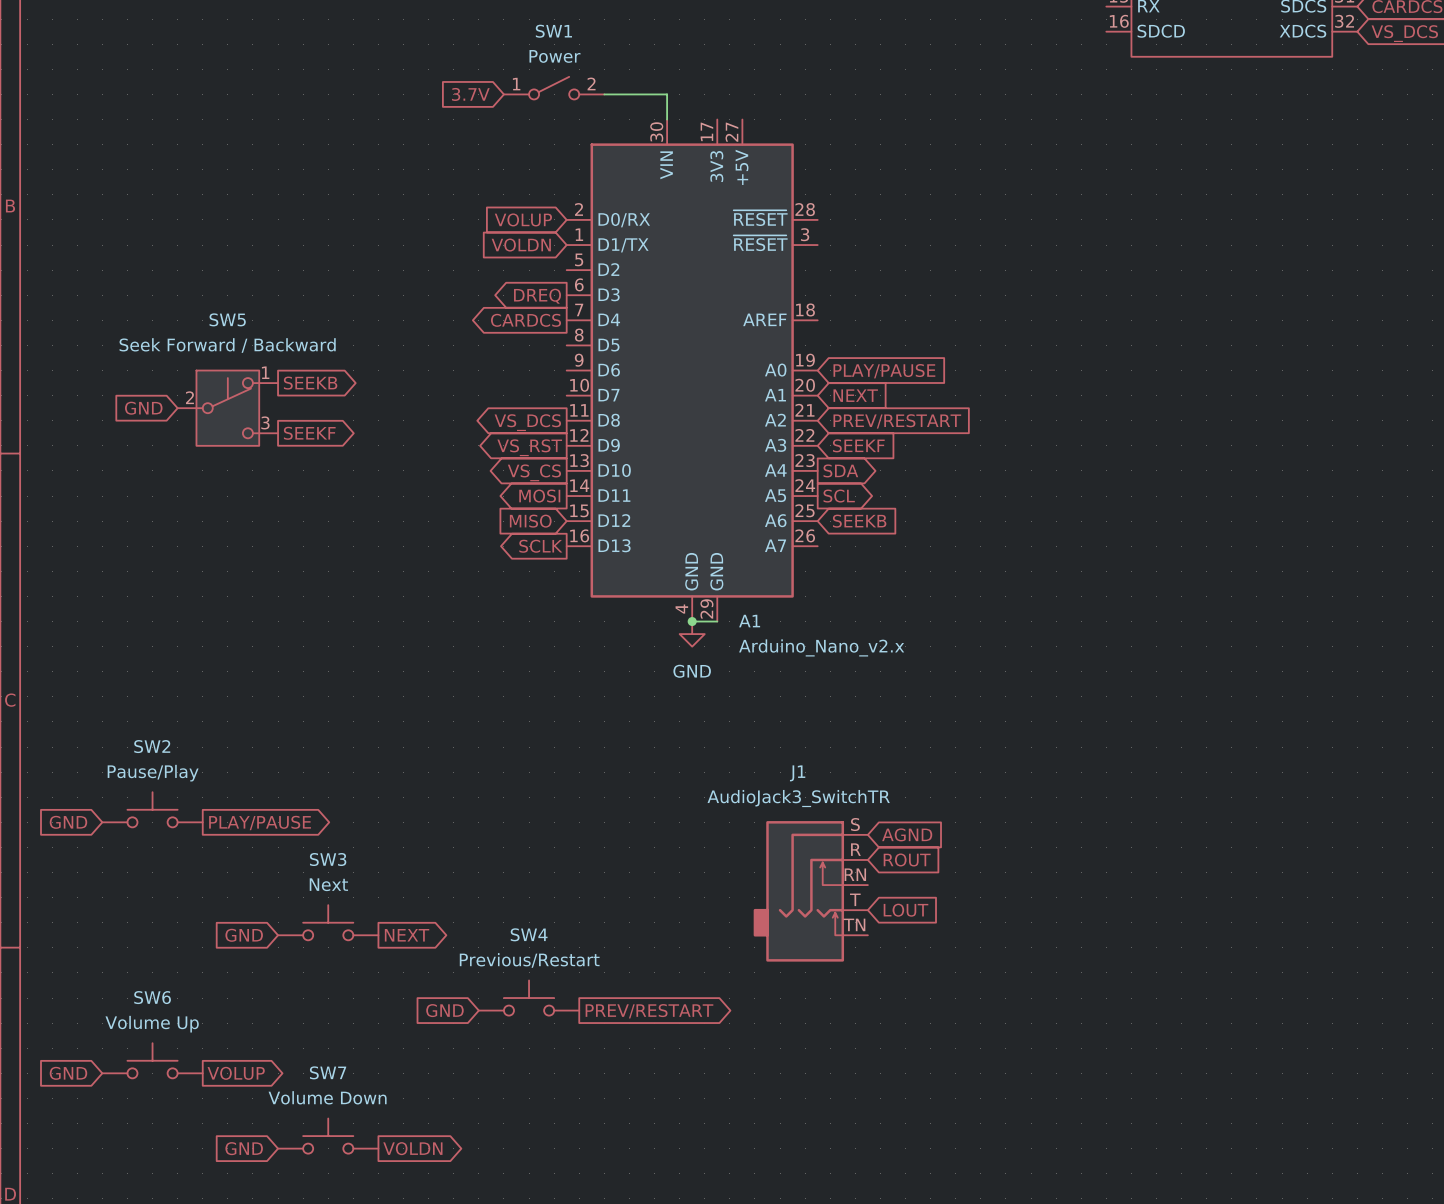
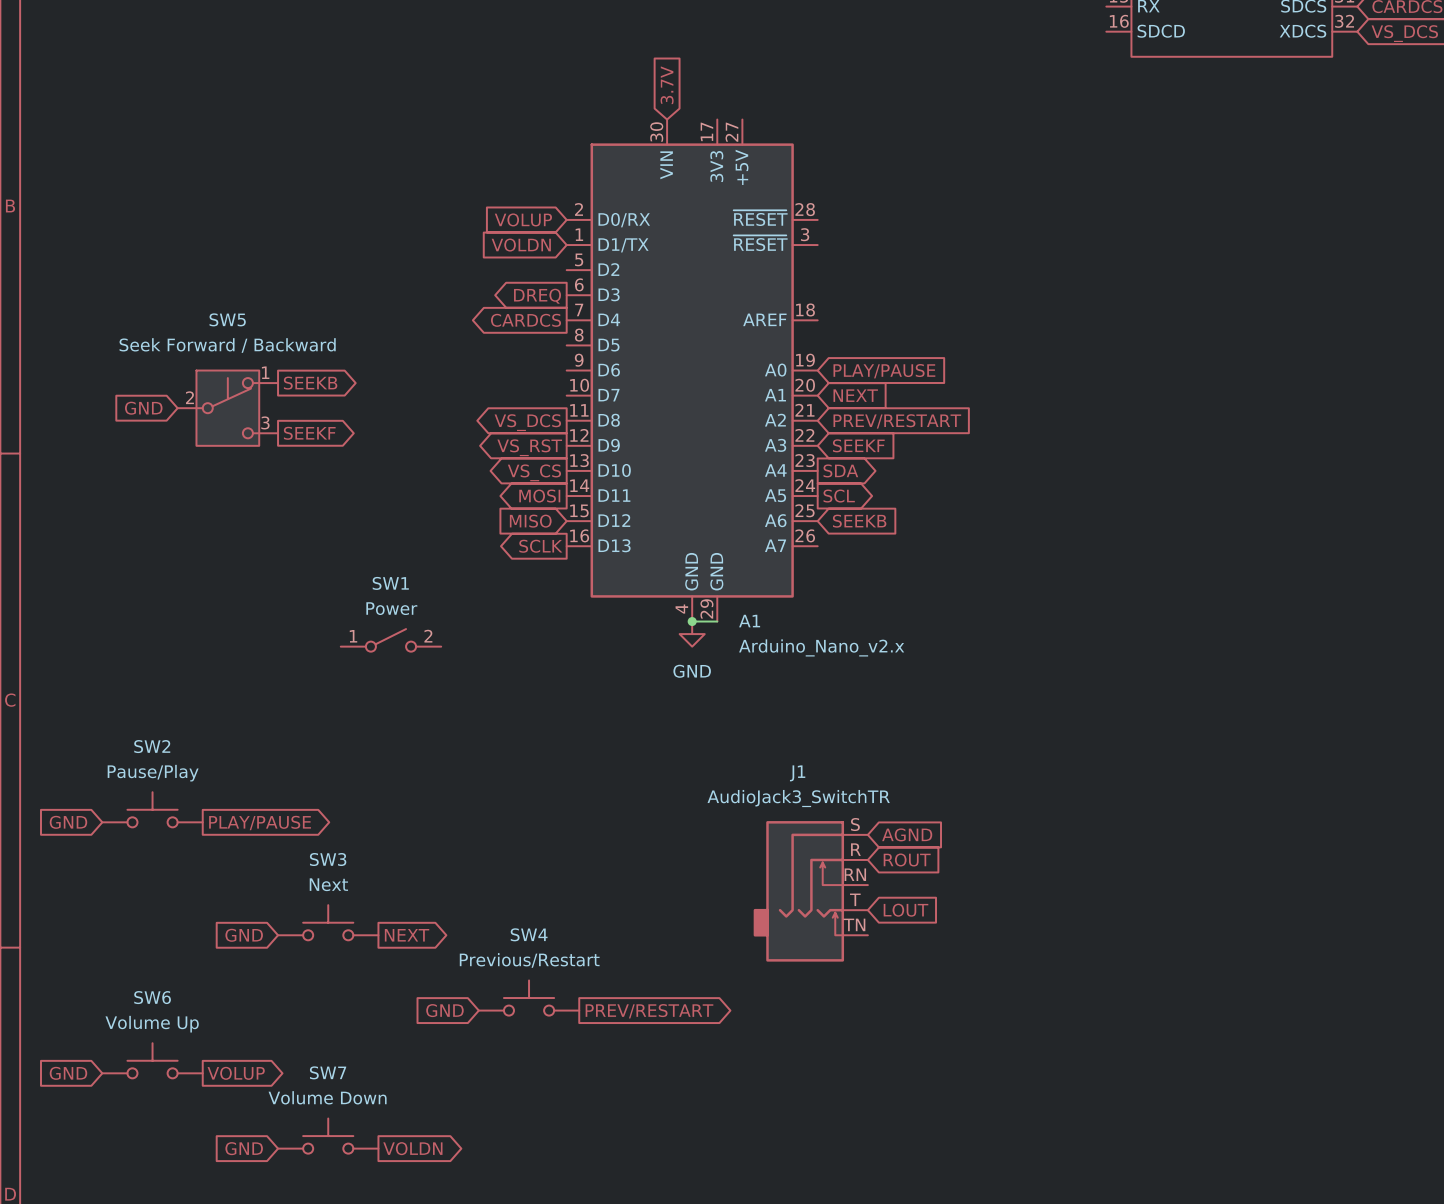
SW1 position: (554, 88) -> (390, 640)
global label rotation: 0° (470, 94) -> 90° clockwise (667, 85)
global label position: 3.7V (470, 94) -> 3.7V (667, 85)
wire: (604, 94) (667, 94) (667, 119) -> none

